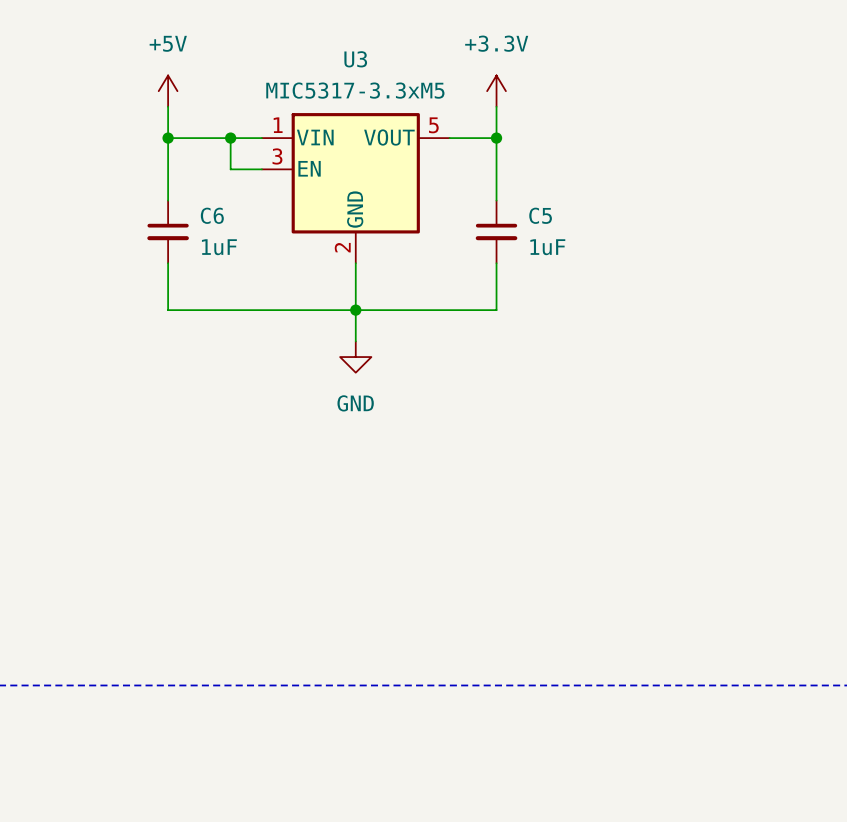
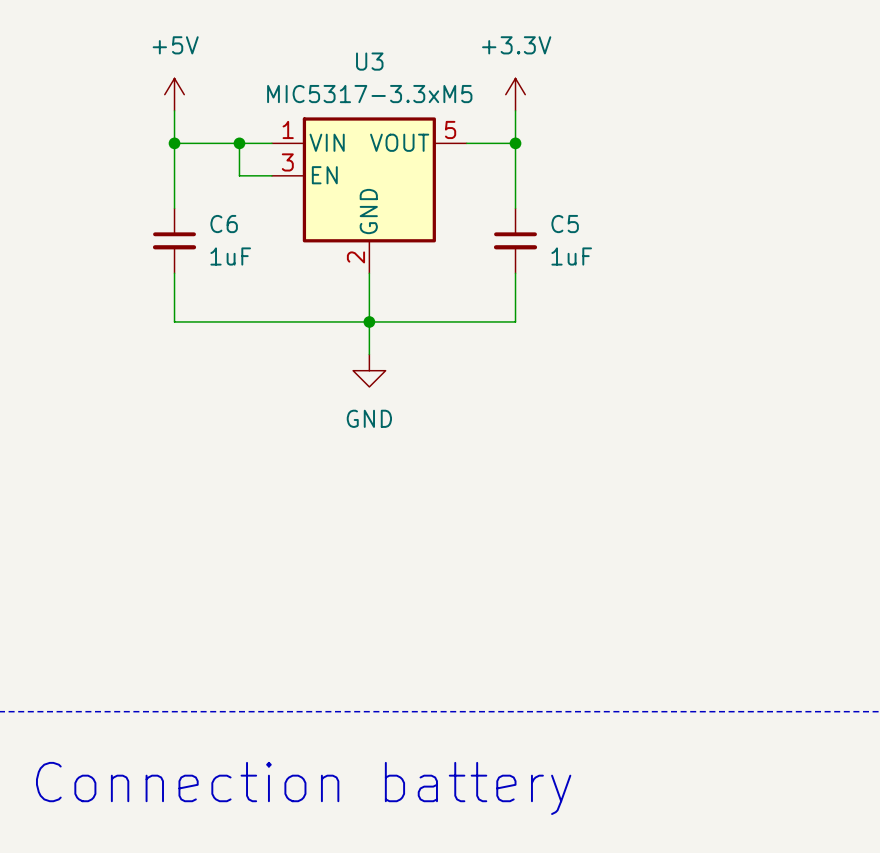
text: none -> Connection battery (303, 788)

